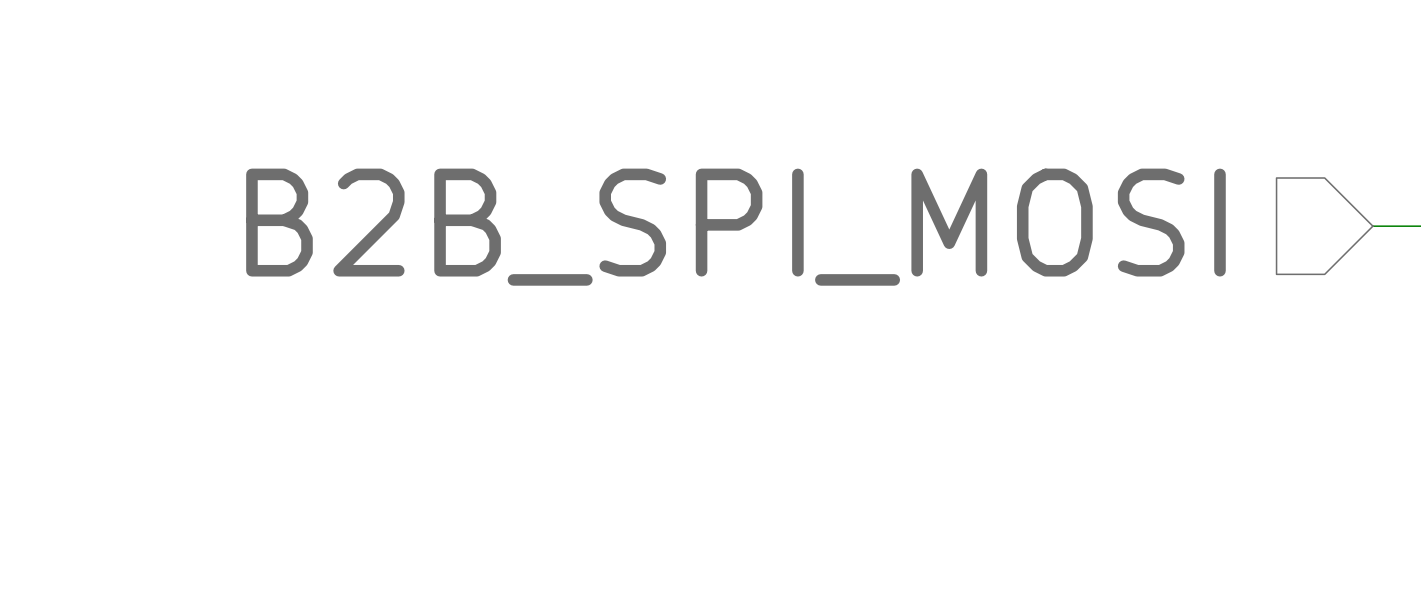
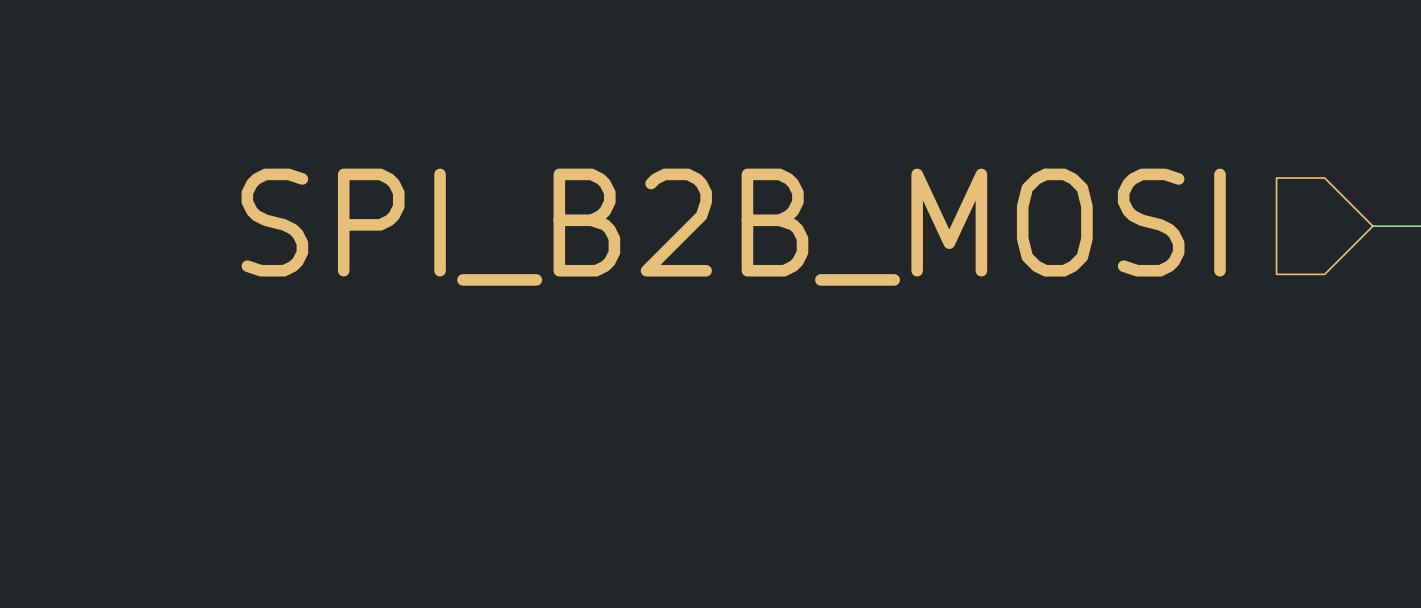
hierarchical label: B2B_SPI_MOSI (735, 227) -> SPI_B2B_MOSI (733, 227)

